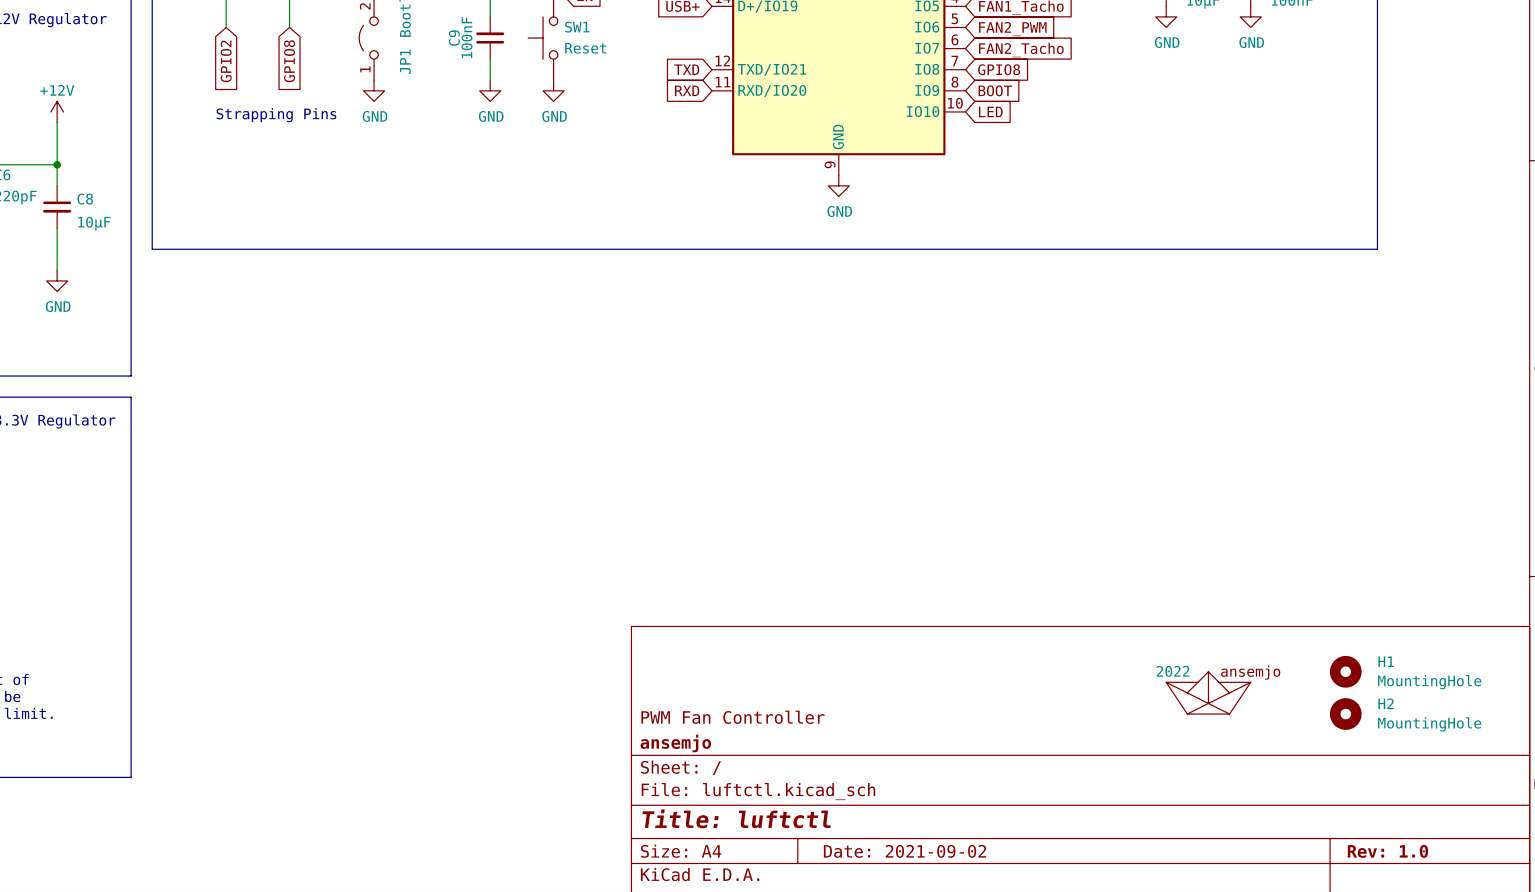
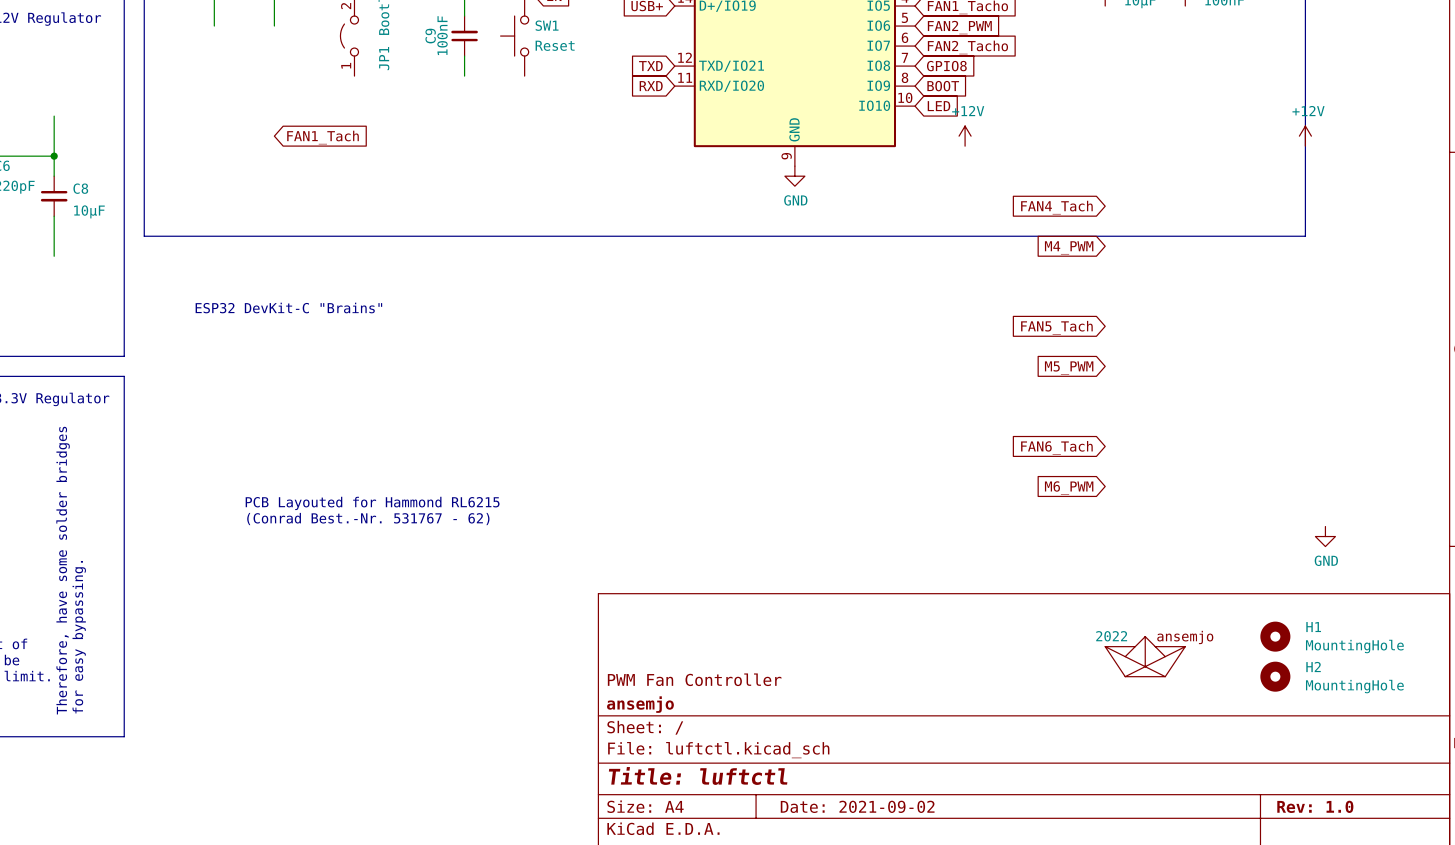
power symbol: GND (1166, 16) -> none
power symbol: GND (1250, 16) -> none
global label: GPIO2 (226, 61) -> none
global label: GPIO8 (289, 61) -> none
power symbol: GND (374, 90) -> none
power symbol: GND (490, 90) -> none
power symbol: GND (553, 90) -> none
power symbol: +12V (57, 111) -> none
text: Strapping Pins (276, 115) -> none
power symbol: none -> +12V (965, 136)
power symbol: none -> +12V (1305, 136)
global label: none -> FAN1_Tach (323, 137)
global label: none -> FAN4_Tach (1056, 207)
global label: none -> M4_PWM (1069, 247)
power symbol: GND (57, 280) -> none
text: none -> ESP32 DevKit-C "Brains" (288, 308)
global label: none -> FAN5_Tach (1056, 327)
global label: none -> M5_PWM (1069, 367)
global label: none -> FAN6_Tach (1056, 447)
global label: none -> M6_PWM (1069, 488)
text: none -> PCB Layouted for Hammond RL6215 (372, 503)
text: none -> (Conrad Best.-Nr. 531767 - 62) (368, 519)
power symbol: none -> GND (1325, 536)
text: none -> Therefore, have some solder bridges (63, 570)
text: none -> for easy bypassing. (79, 637)

